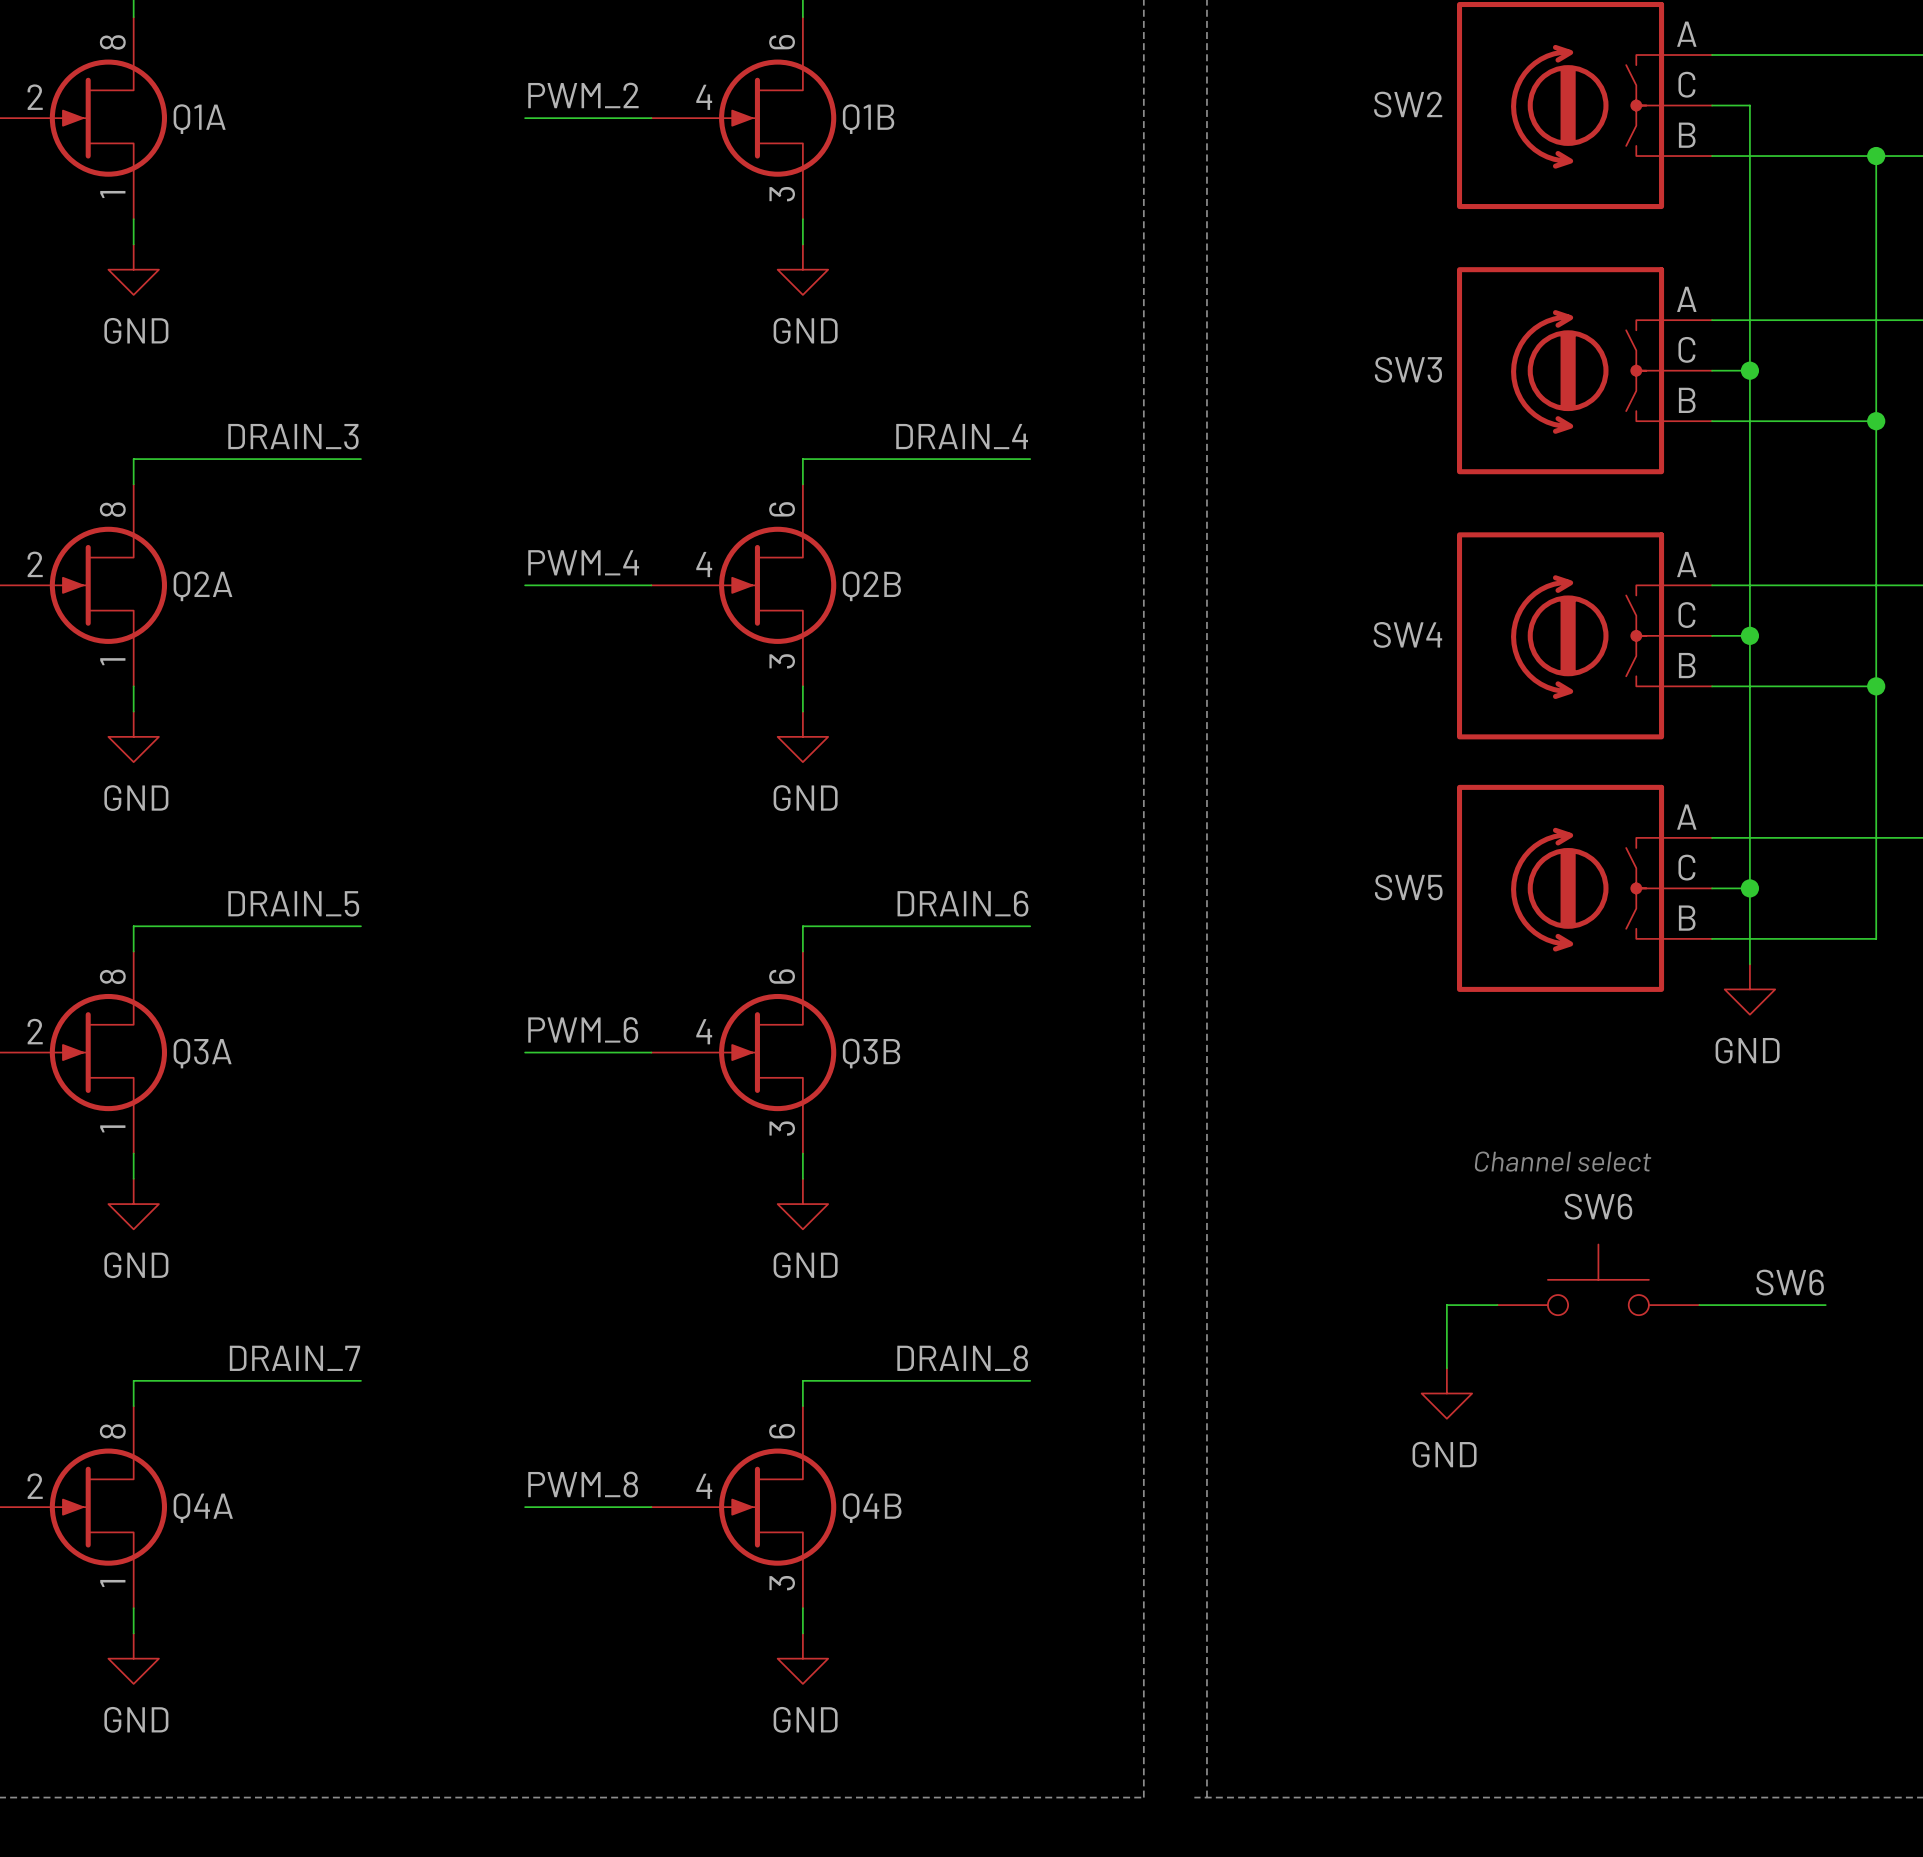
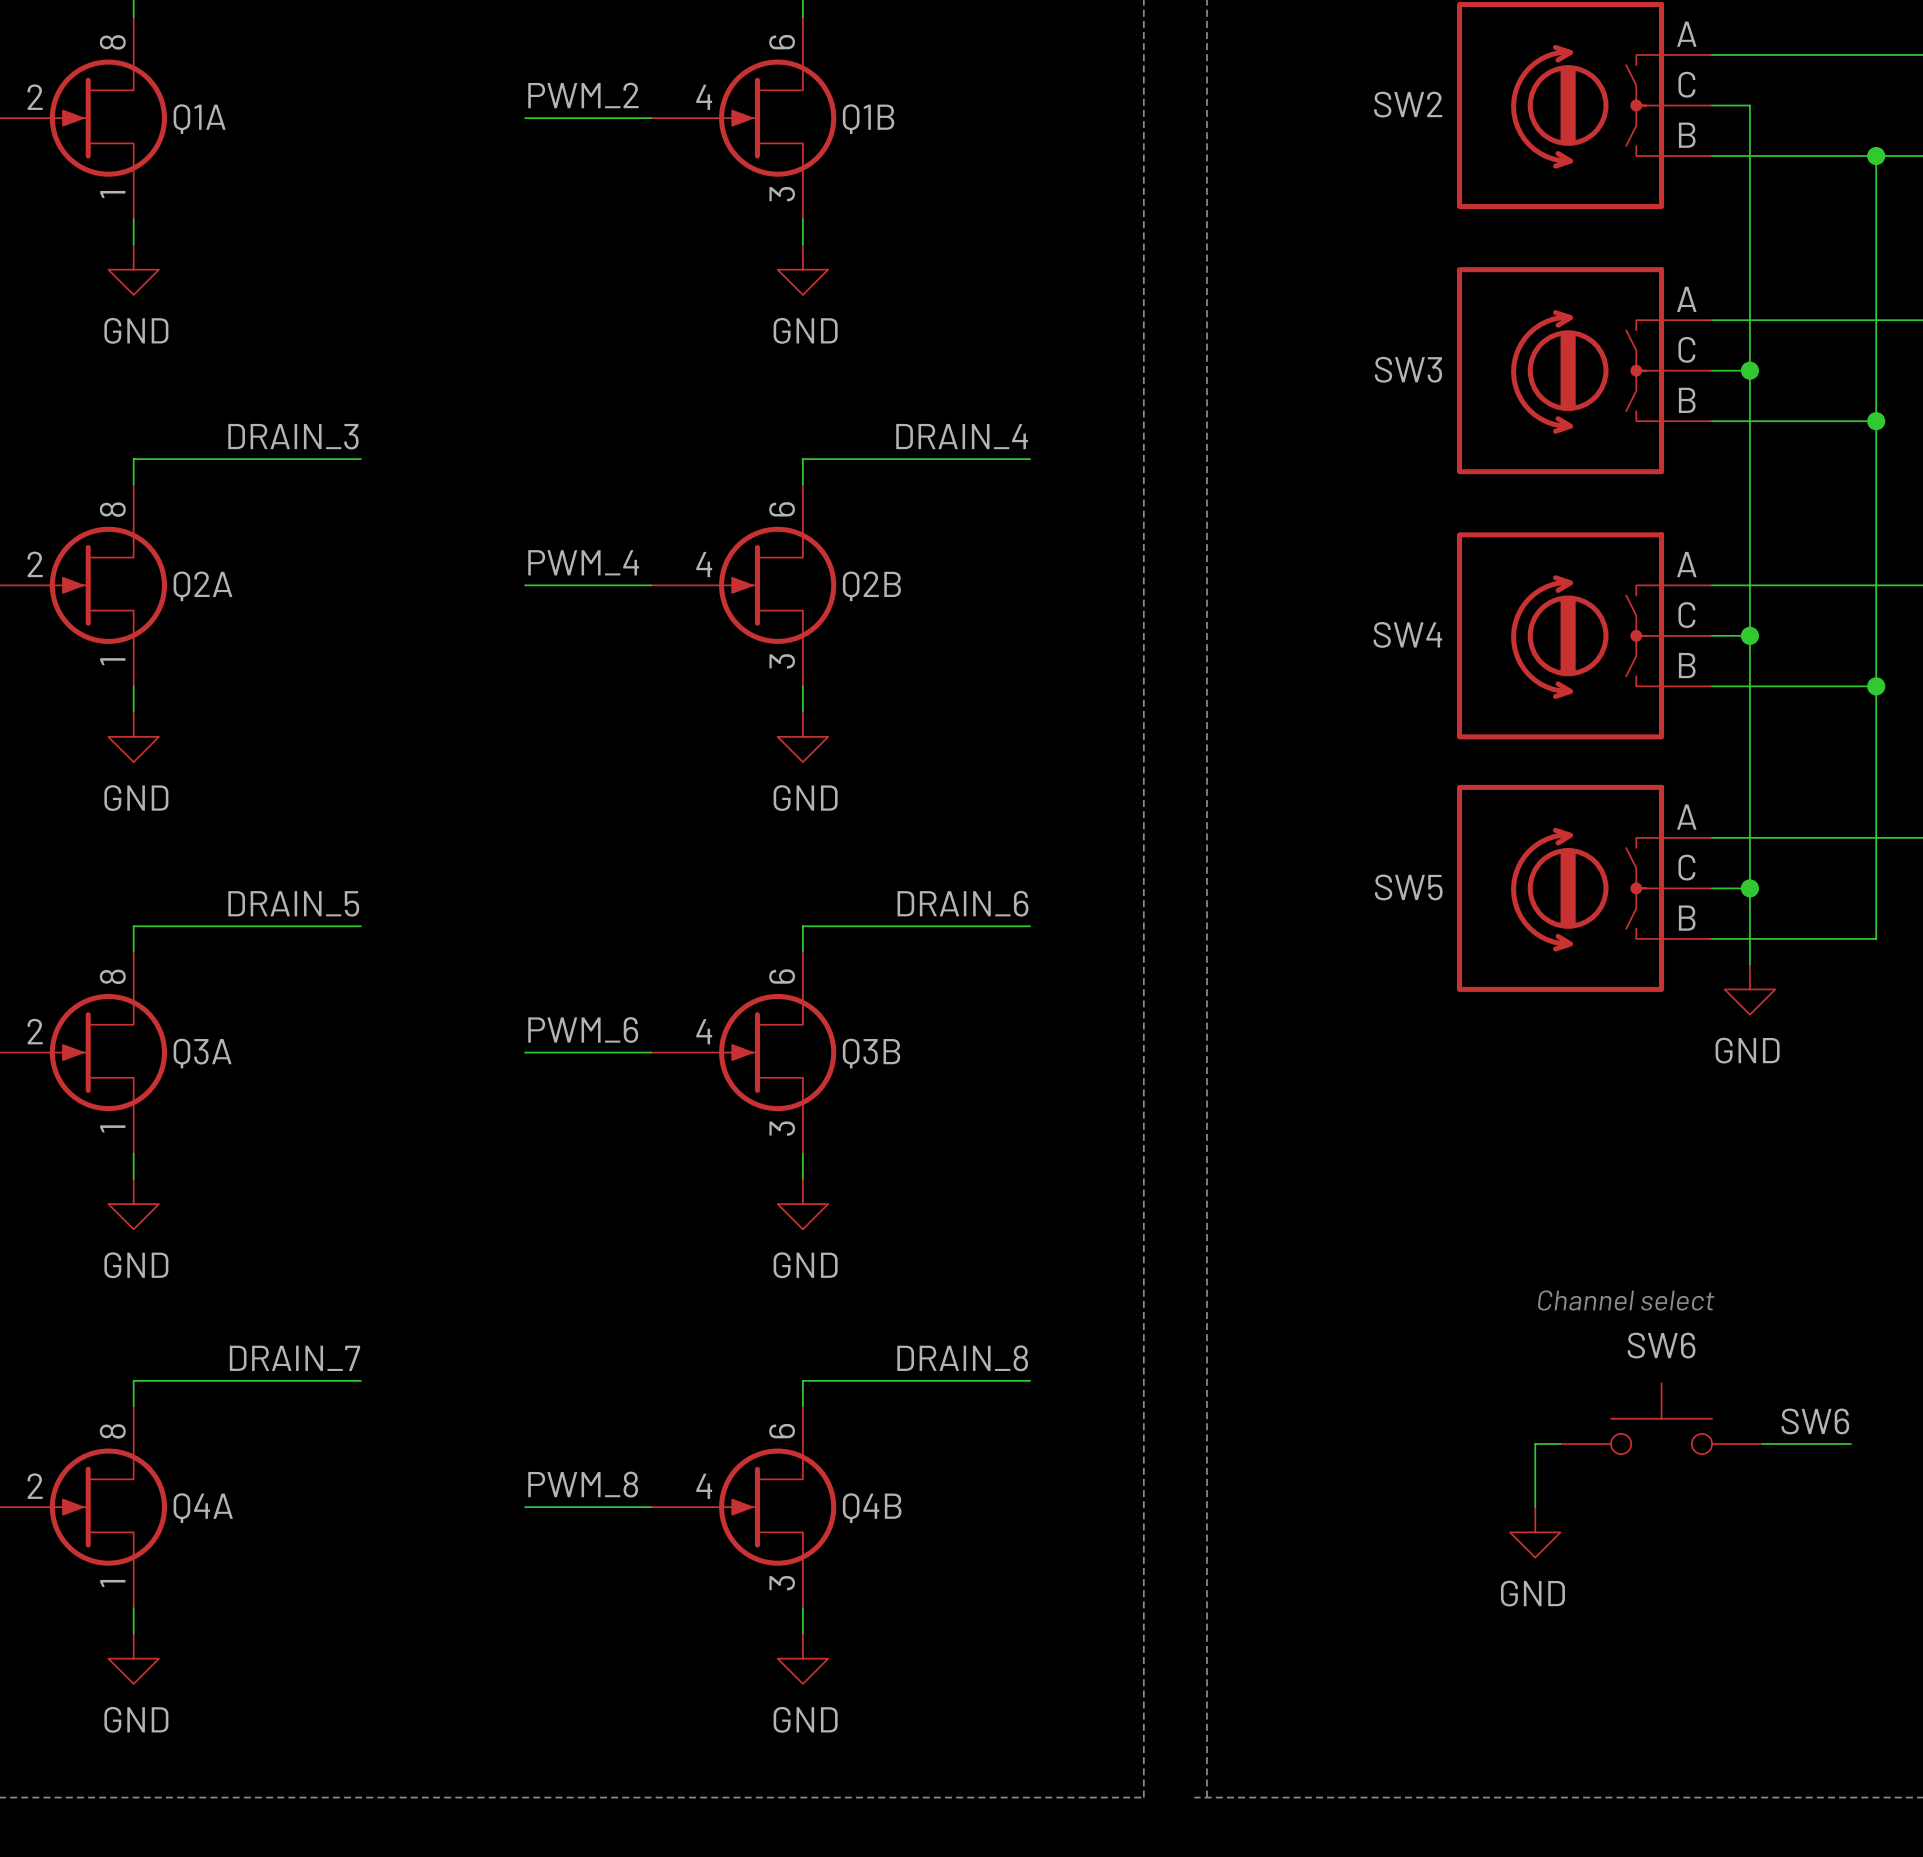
text position: Channel select (1562, 1161) -> Channel select (1626, 1300)
SW6 position: (1598, 1279) -> (1661, 1418)
label position: SW6 (1790, 1282) -> SW6 (1815, 1421)
wire: (1497, 1305) (1446, 1305) (1446, 1368) -> none
wire: (1699, 1305) (1825, 1305) -> none
power symbol position: GND (1446, 1393) -> GND (1535, 1532)
wire: none -> (1560, 1443) (1535, 1443) (1535, 1507)
wire: none -> (1762, 1443) (1850, 1443)

